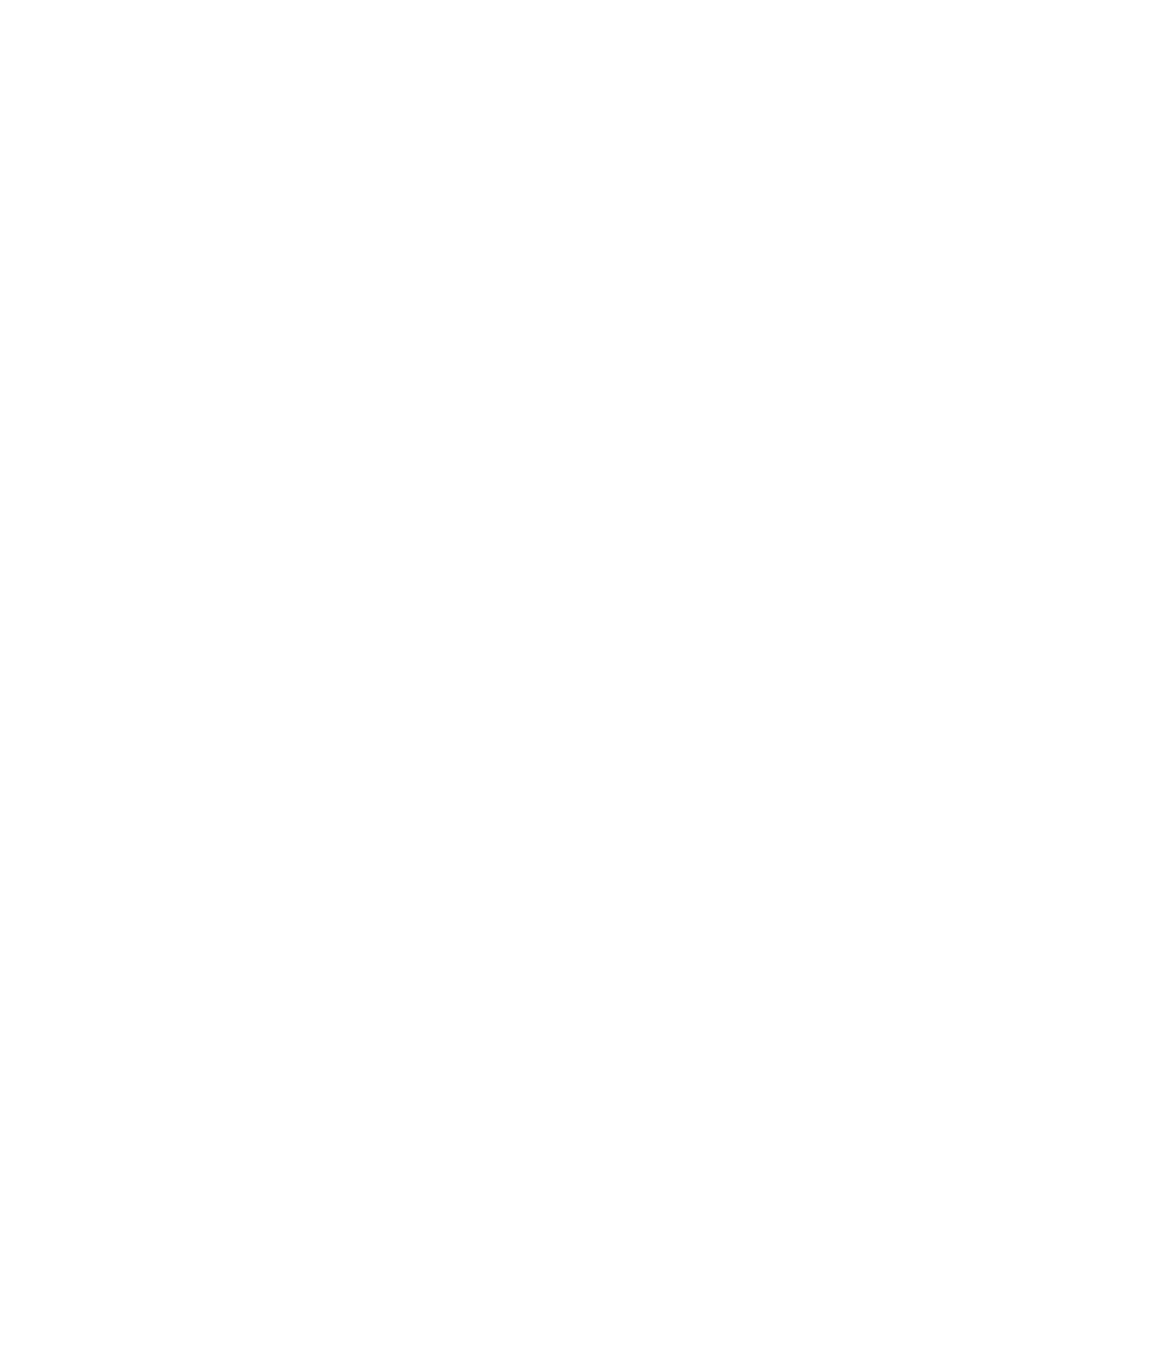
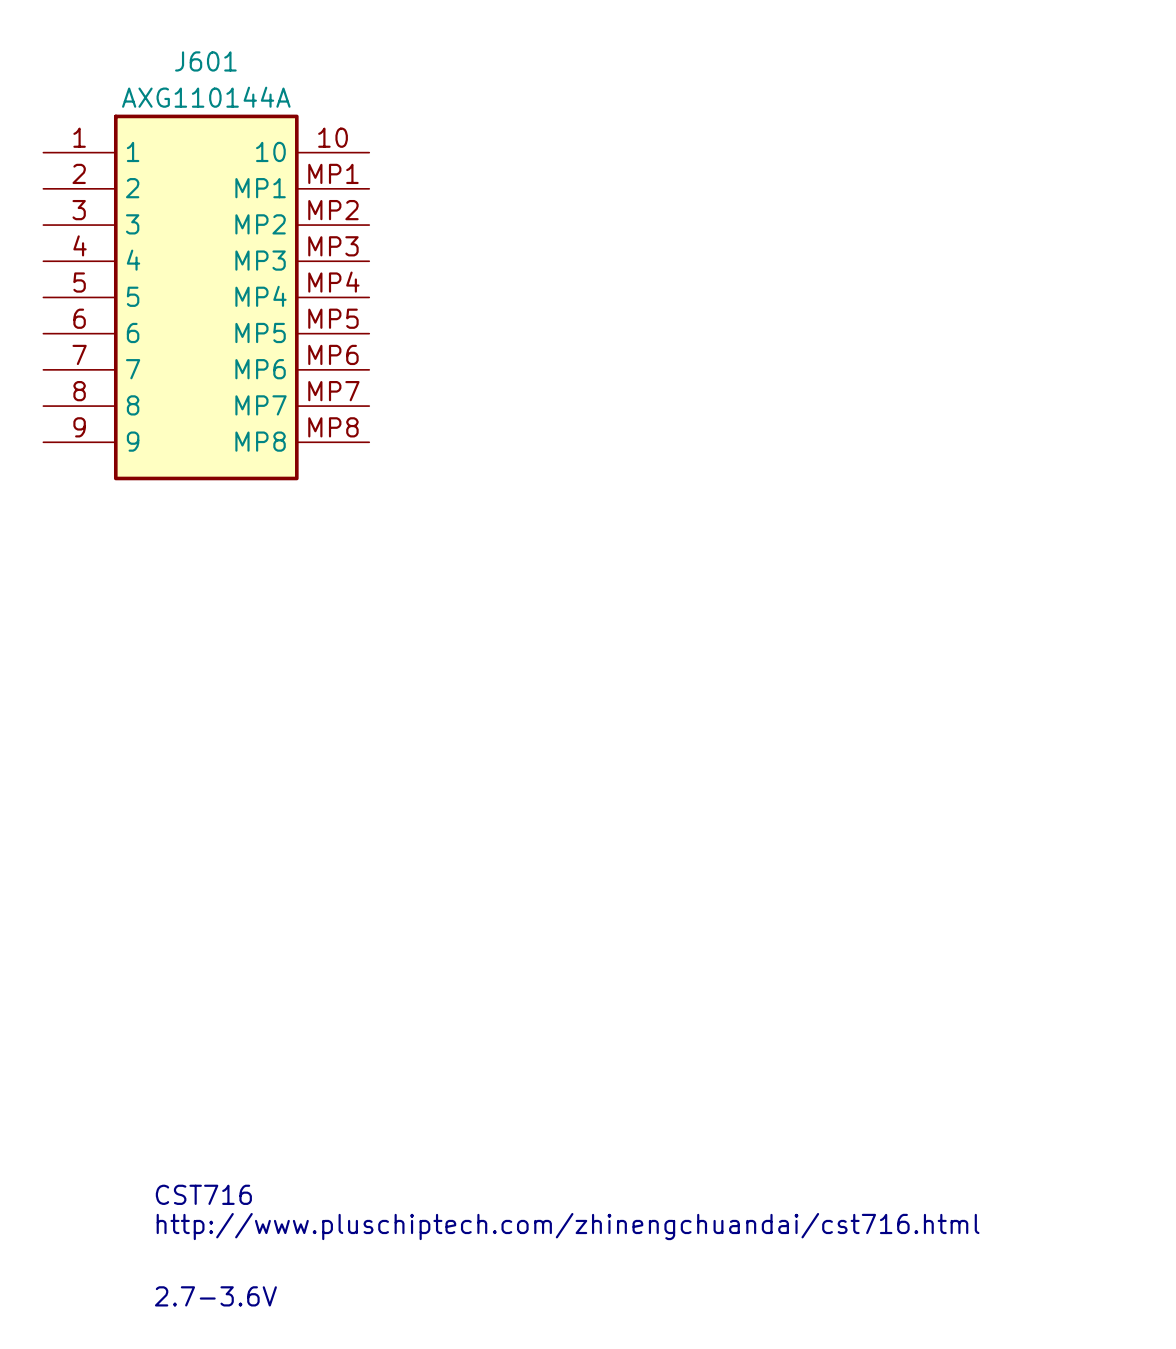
J601: none -> AXG110144A (206, 297)
text: none -> CST716 (203, 1194)
text: none -> http://www.pluschiptech.com/zhinengchuandai/cst716.html (568, 1226)
text: none -> 2.7-3.6V (215, 1296)

